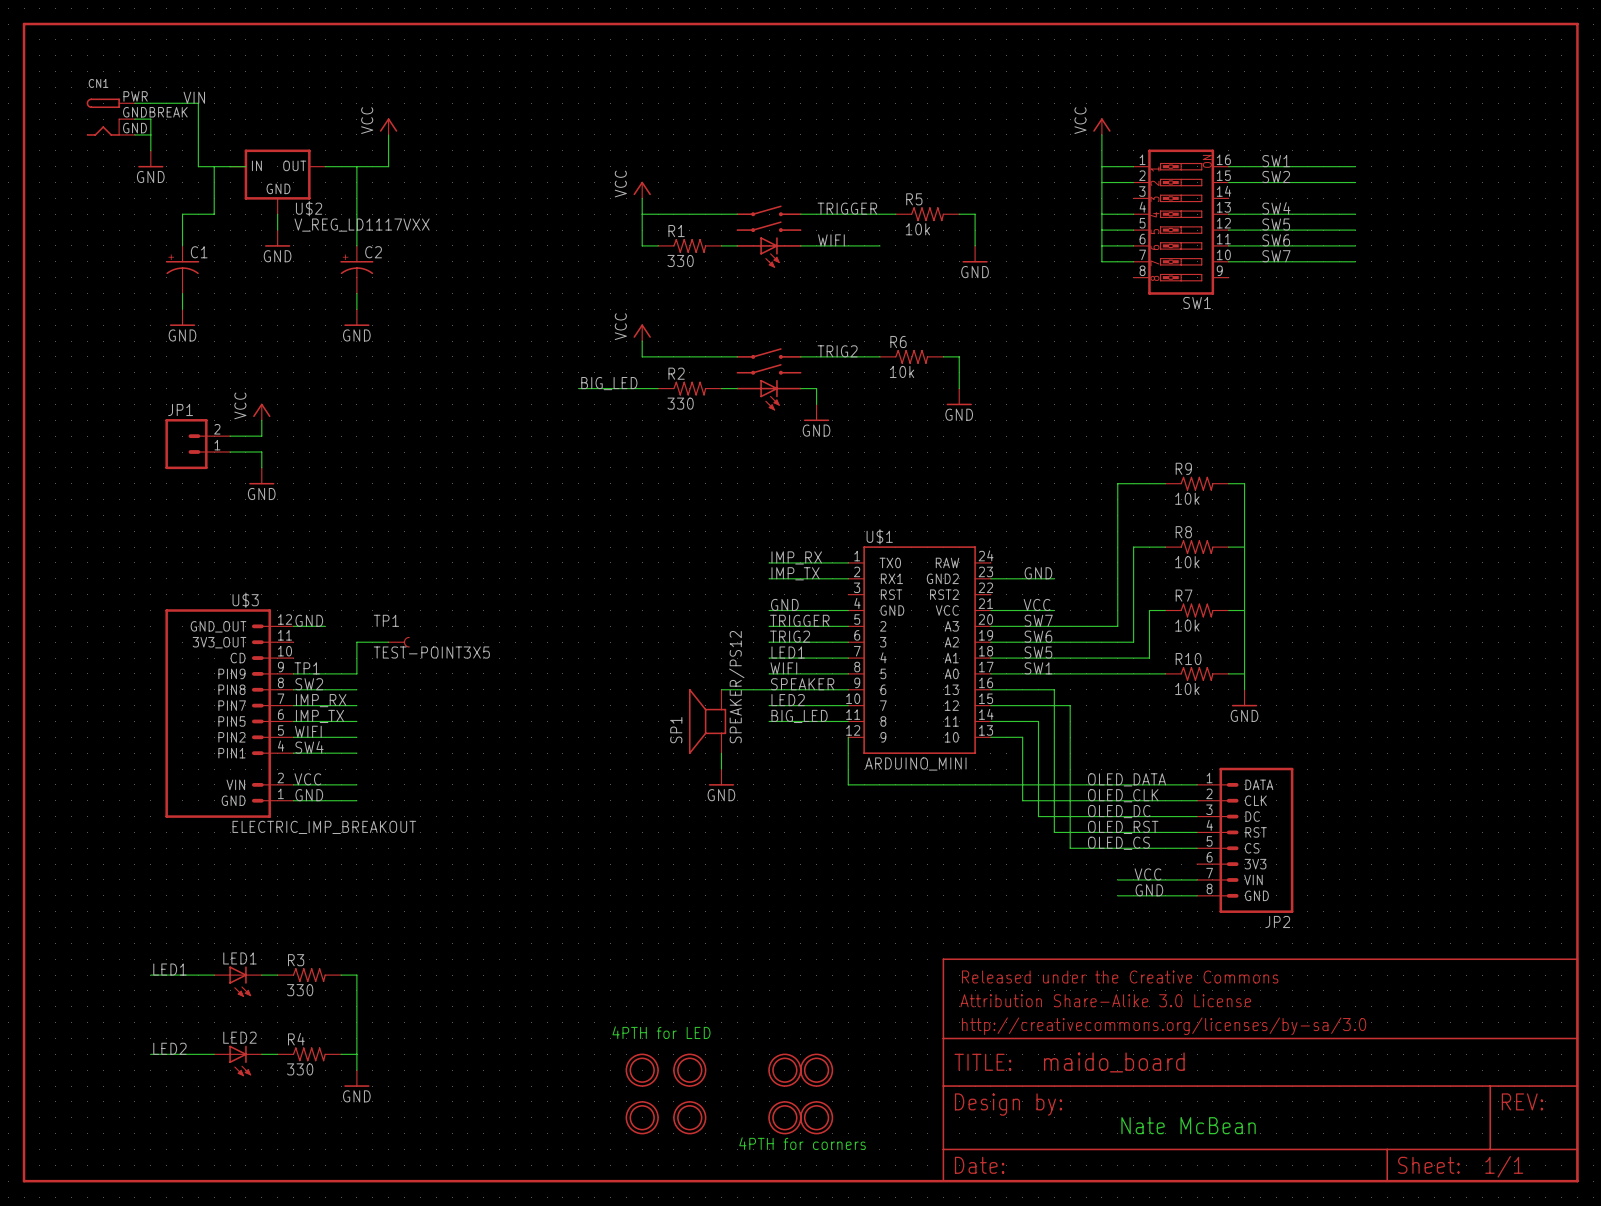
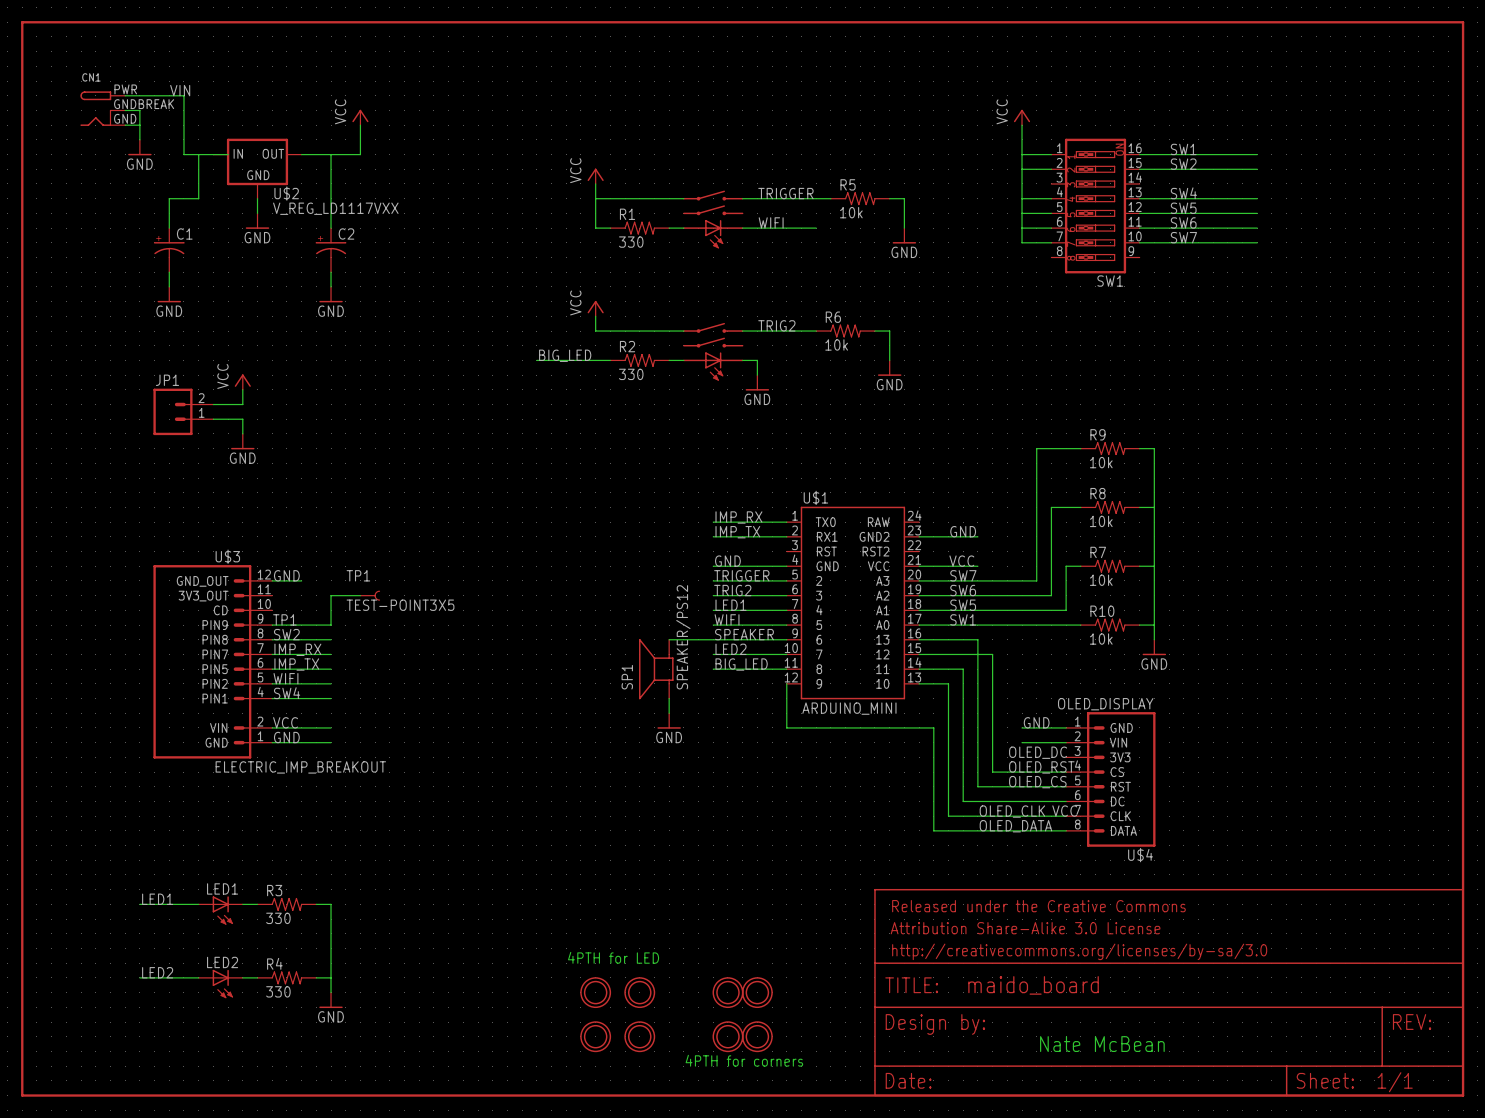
label position: OLED_DATA (1127, 779) -> OLED_DATA (1015, 826)
wire: (1006, 784) (1101, 784) -> (933, 727) (933, 830) (1036, 830)
label position: OLED_CLK (1123, 795) -> OLED_CLK (1012, 811)
wire: (1022, 800) (1101, 800) -> (948, 742) (948, 816) (1036, 816)
wire: (1038, 816) (1197, 816) -> (963, 757) (963, 801) (1066, 801)
wire: (1054, 832) (1070, 832) (1070, 848) -> (977, 772) (977, 786) (992, 786)
U$4: none -> OLED_DISPLAY (1110, 779)
JP2: (1245, 840) -> none
label position: GND (1149, 890) -> GND (1036, 722)

